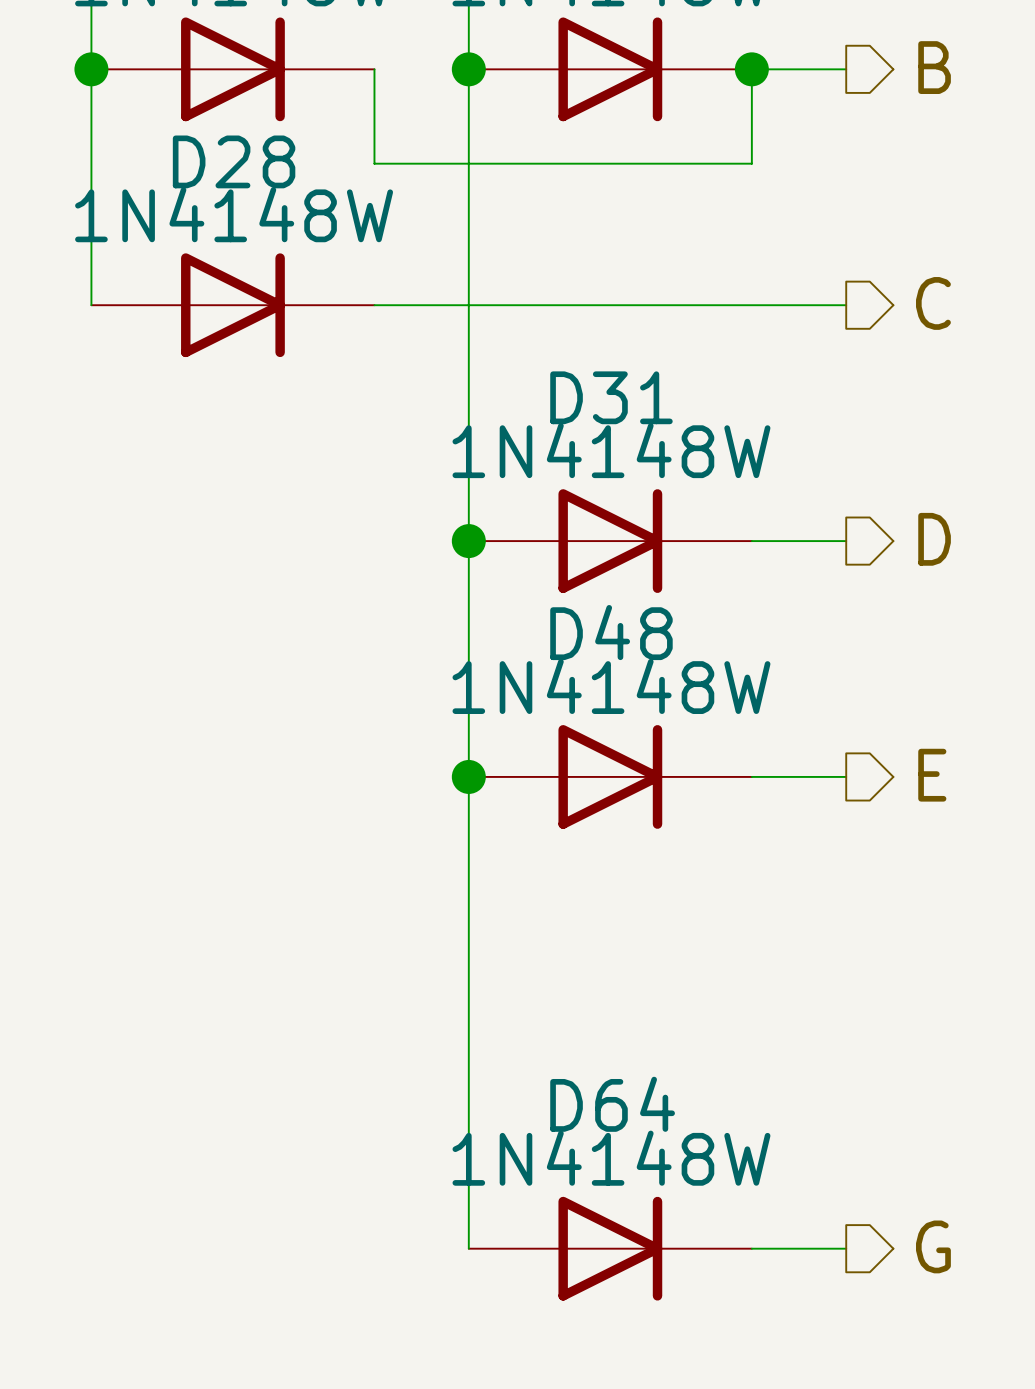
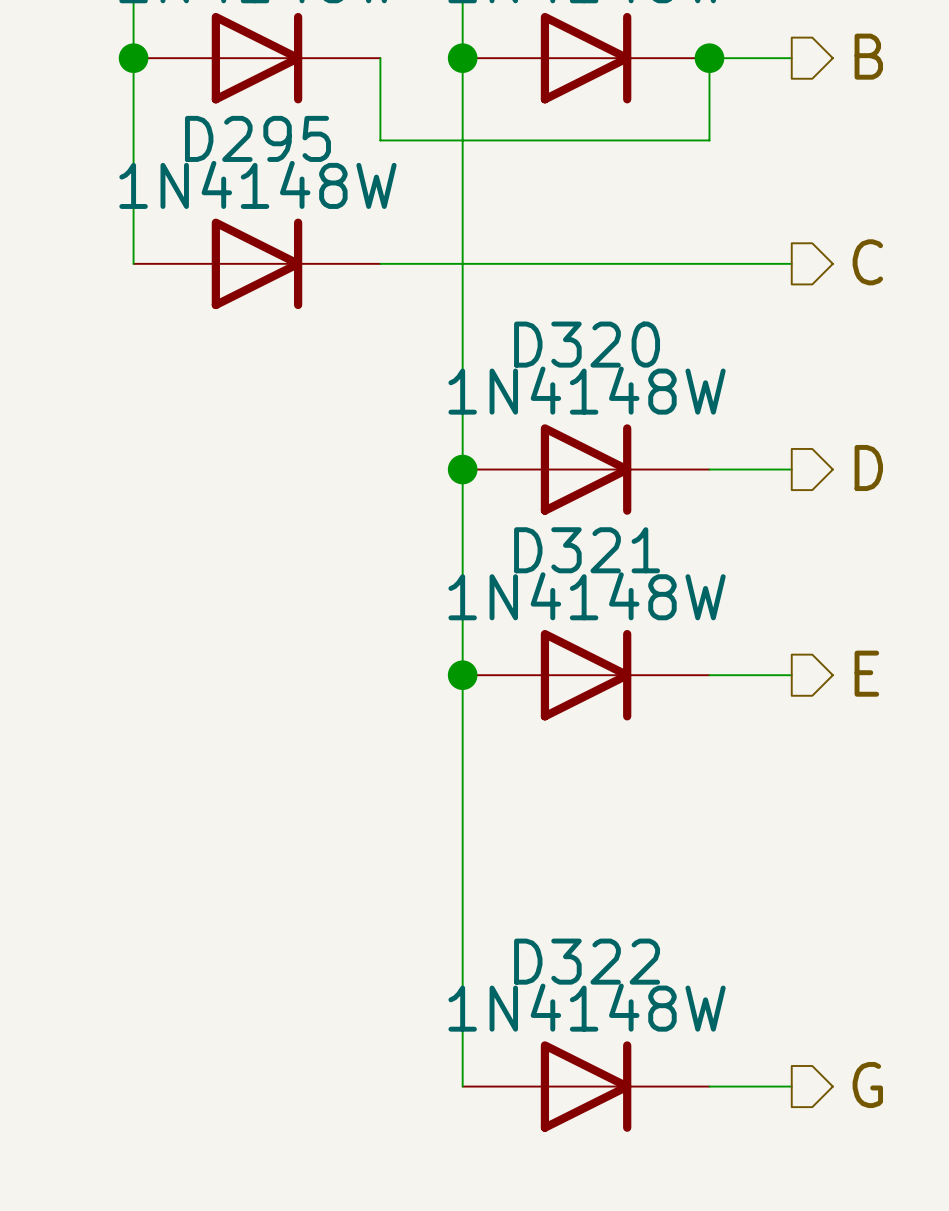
D28 name: D28 (234, 161) -> D295 (257, 138)
D31 name: D31 (611, 397) -> D320 (587, 344)
D48 name: D48 (611, 632) -> D321 (587, 550)
D64 name: D64 (612, 1104) -> D322 (587, 961)

